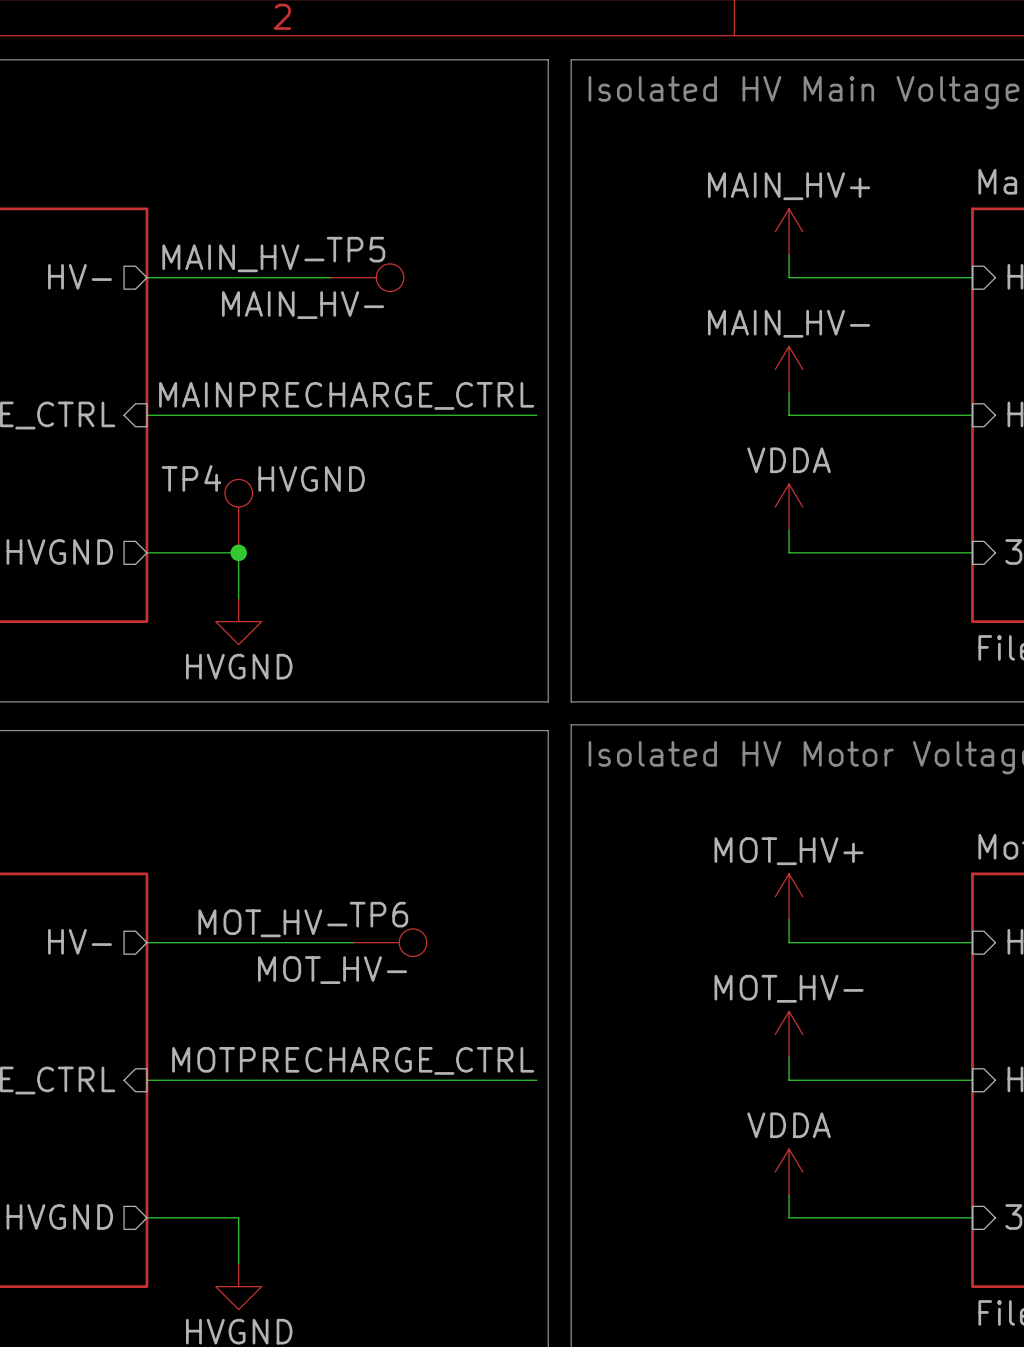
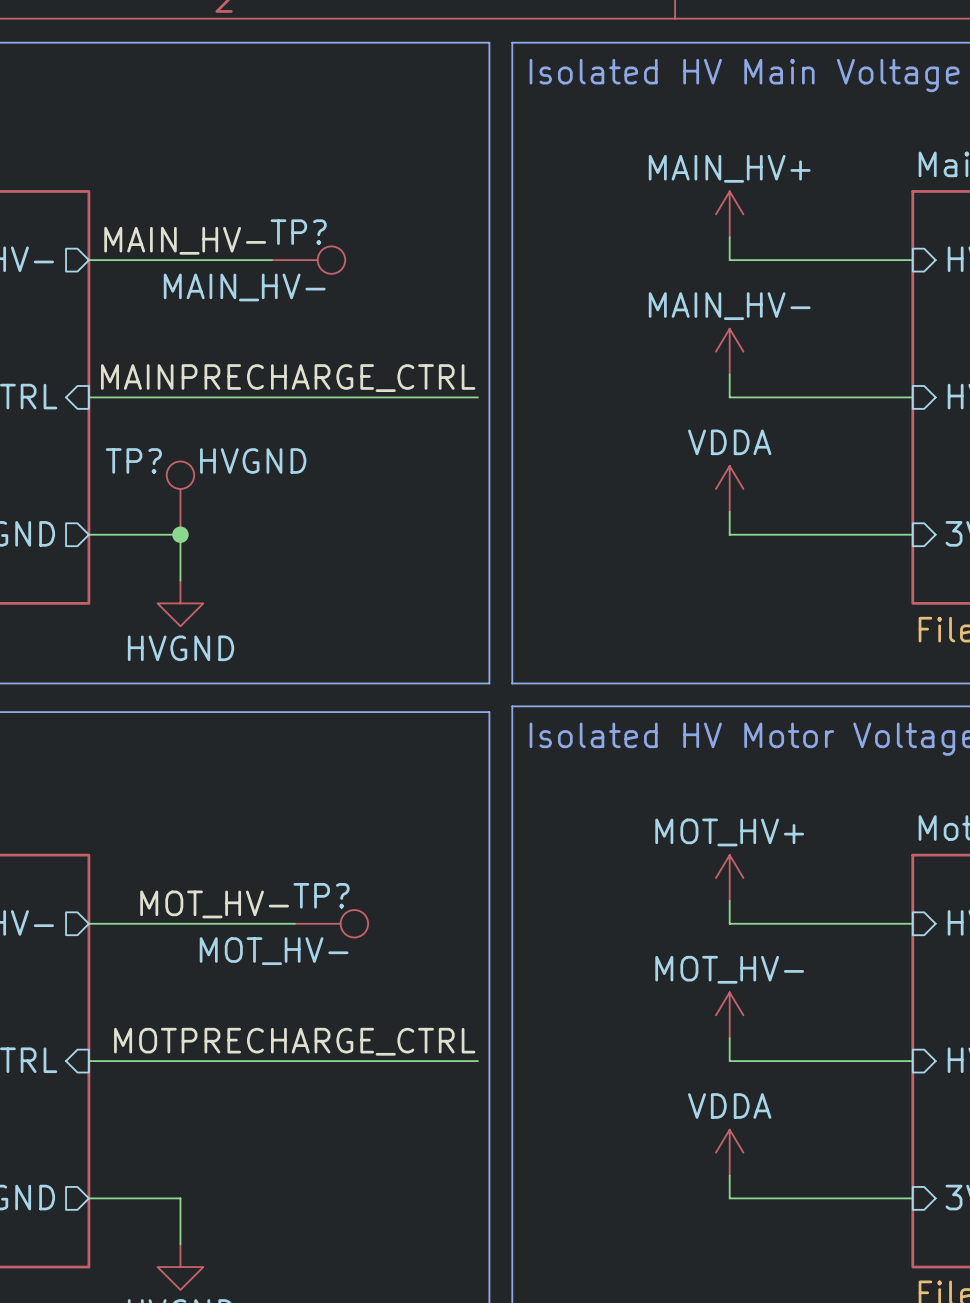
TP5 name: TP5 (356, 249) -> TP? (298, 232)
TP4 name: TP4 (191, 478) -> TP? (133, 460)
TP6 name: TP6 (378, 914) -> TP? (321, 895)

